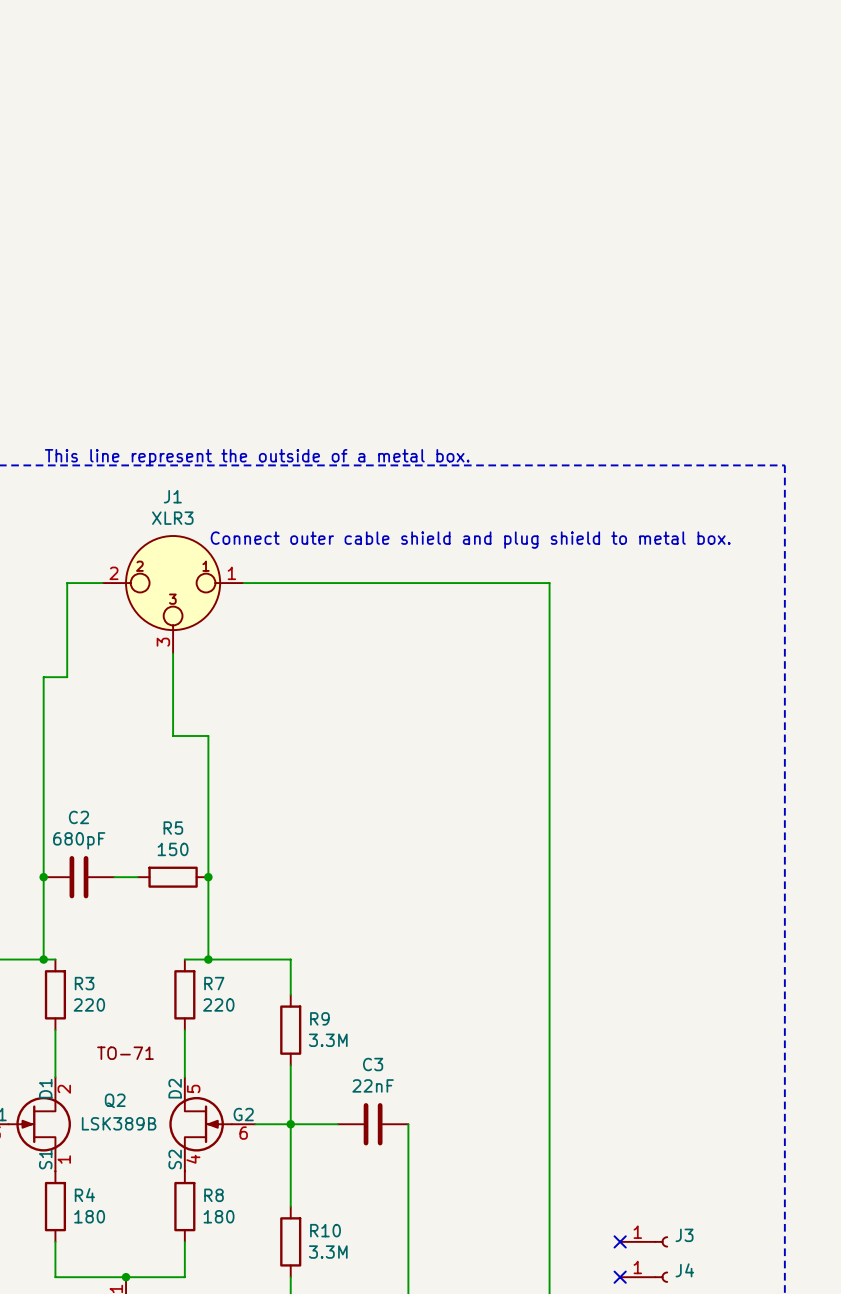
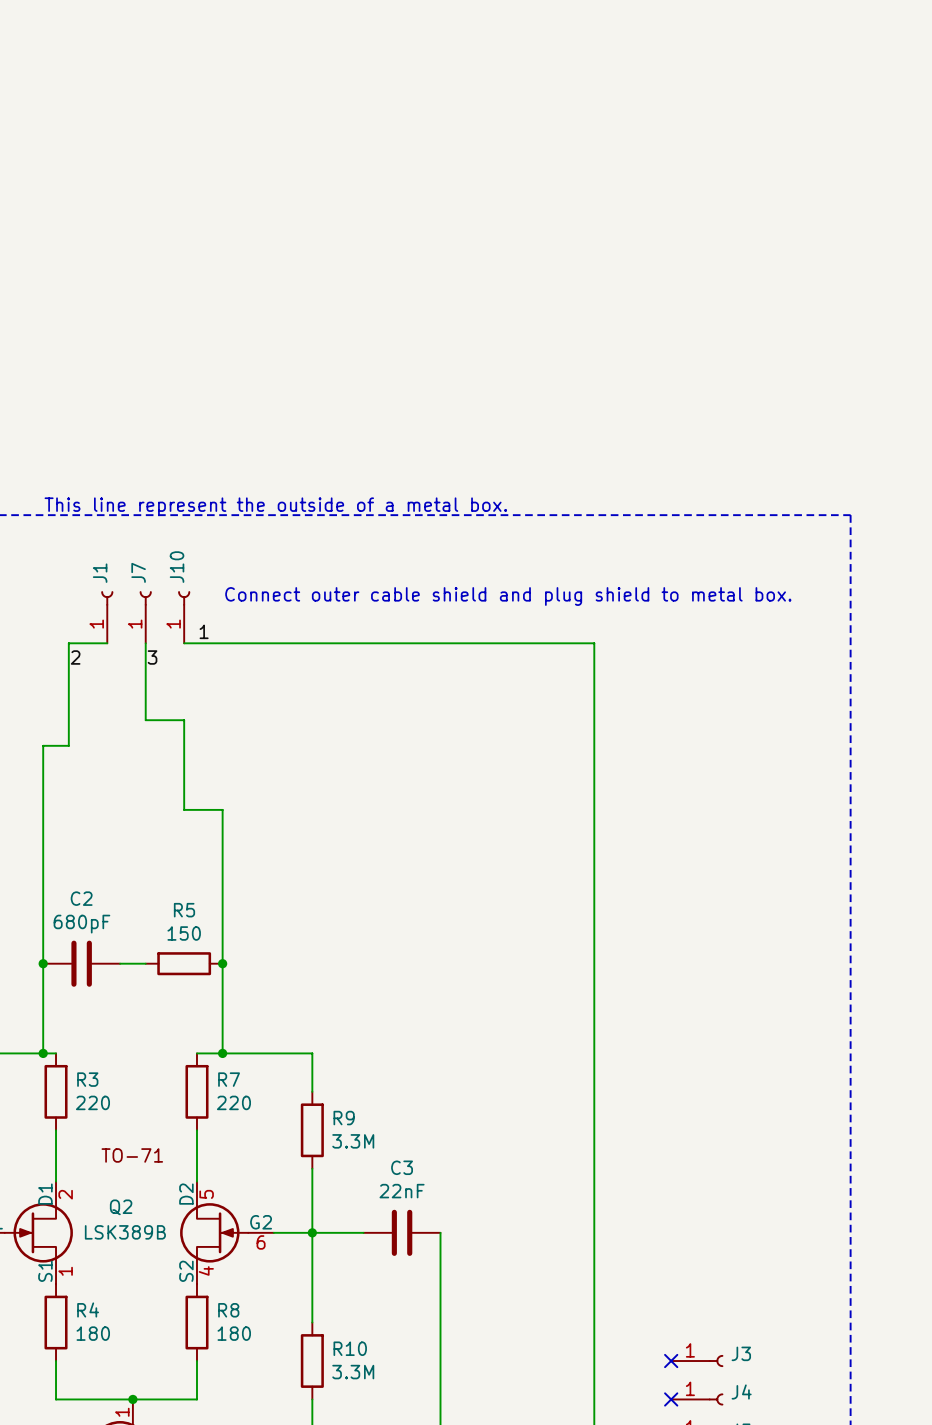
J1 name position: J1 (172, 496) -> J1 (100, 573)
J1 value: XLR3 (172, 518) -> none
J1 symbol: [102, 535, 244, 654] -> [101, 591, 114, 644]
J7: none -> (145, 617)
J10: none -> (184, 617)
label: none -> 1 (204, 631)
wire: none -> (145, 643) (145, 720) (184, 720)
label: none -> 2 (75, 657)
label: none -> 3 (152, 657)

